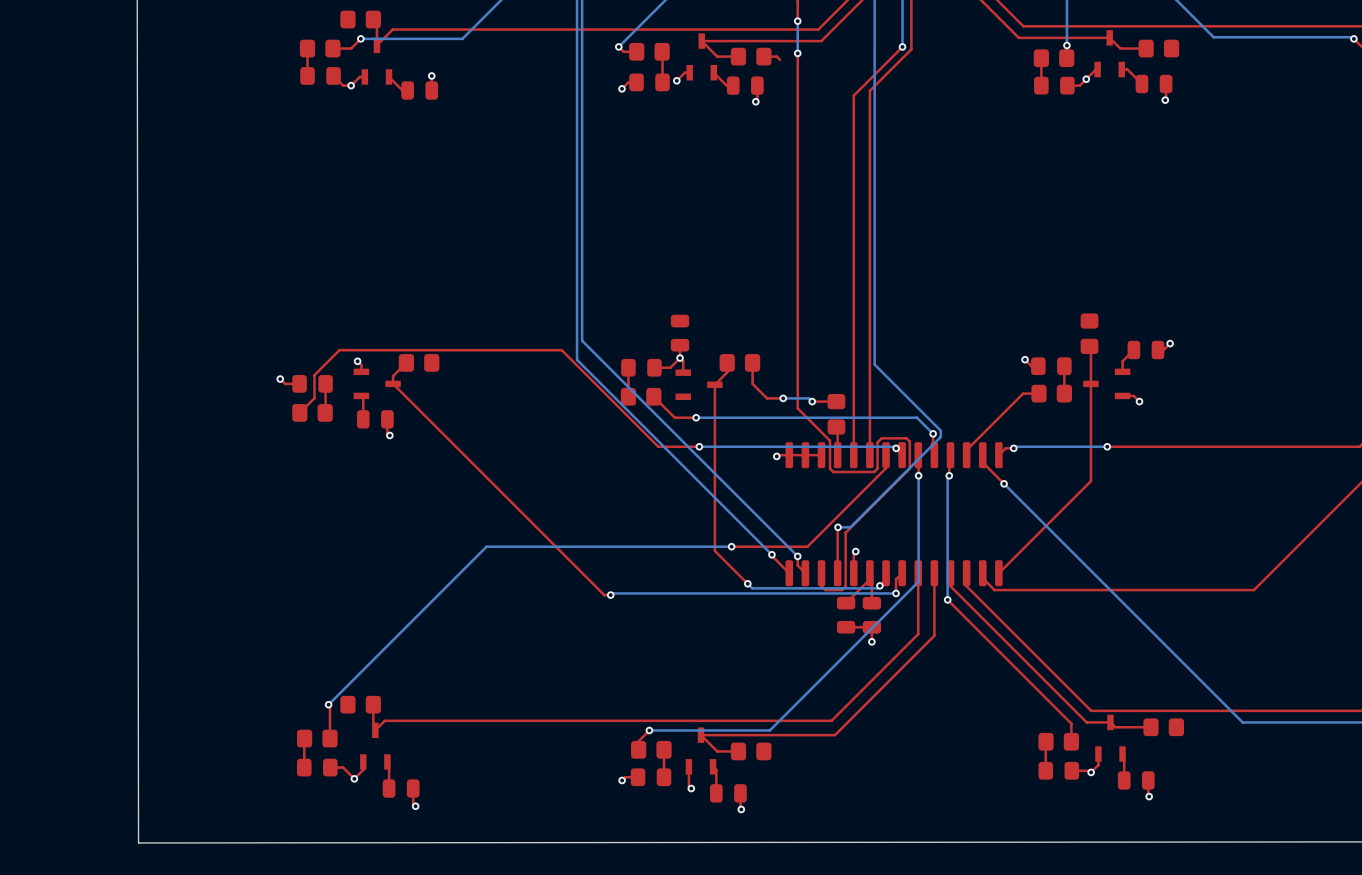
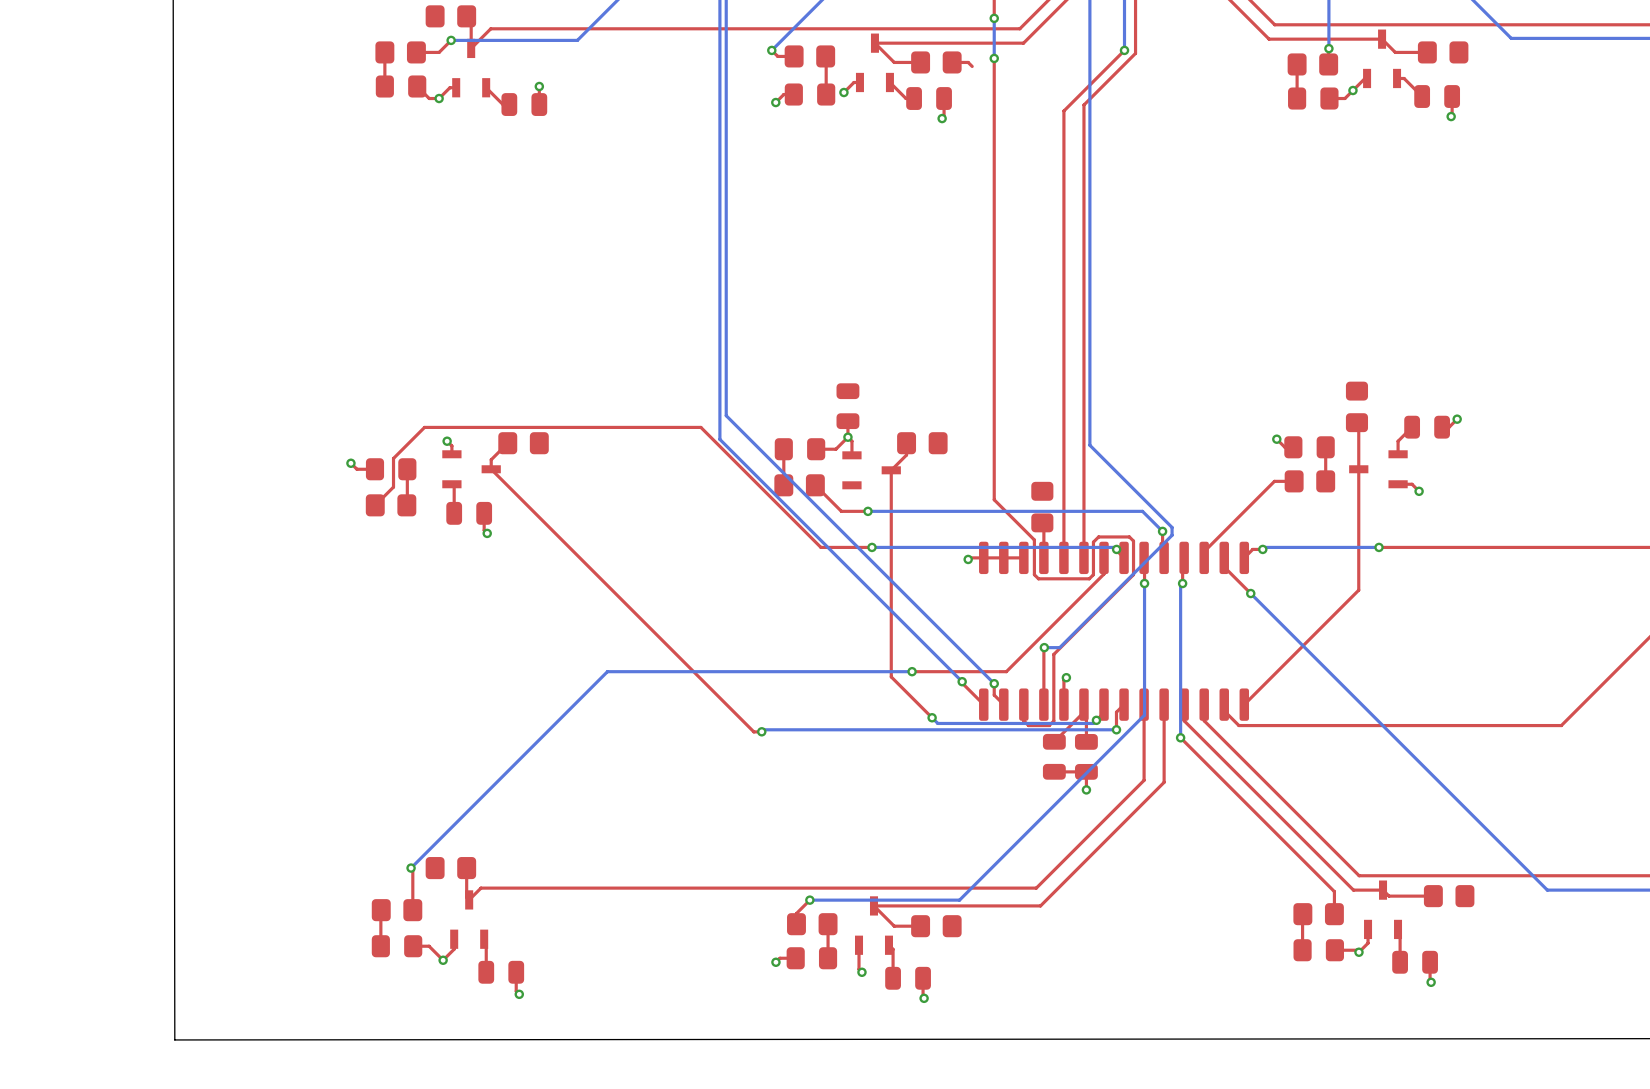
top track: (752, 362) (752, 383) (767, 398) (783, 398) -> none
bottom track: (783, 398) (809, 398) (812, 401) -> none
via: (783, 398) -> none
via: (812, 401) -> none
top track: (836, 401) (812, 401) -> none

